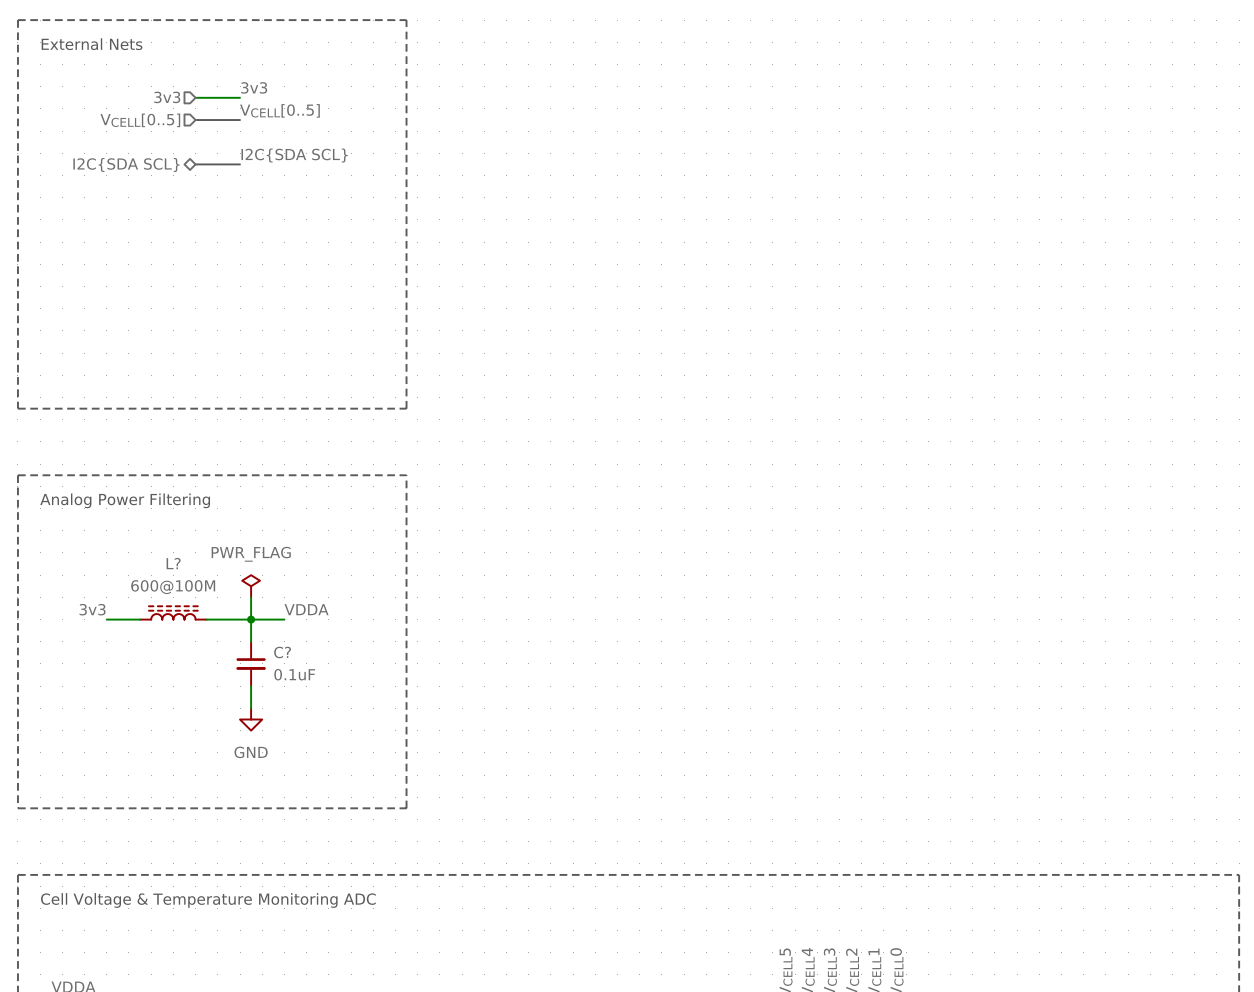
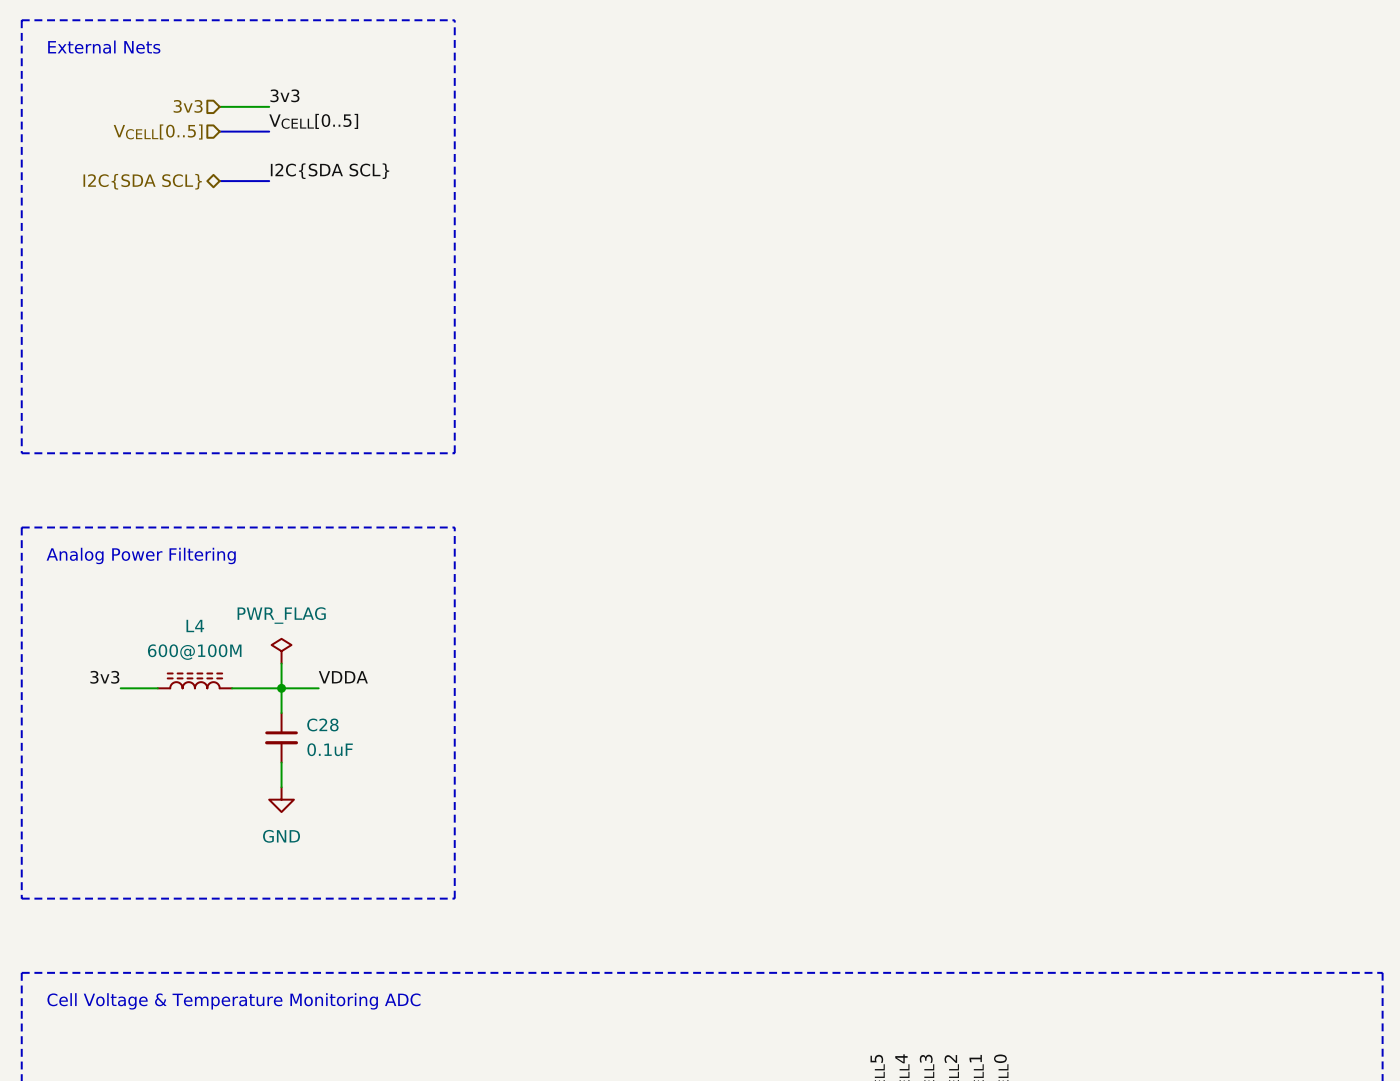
L? name: L? (173, 563) -> L4 (195, 626)
C? name: C? (282, 652) -> C28 (322, 724)

